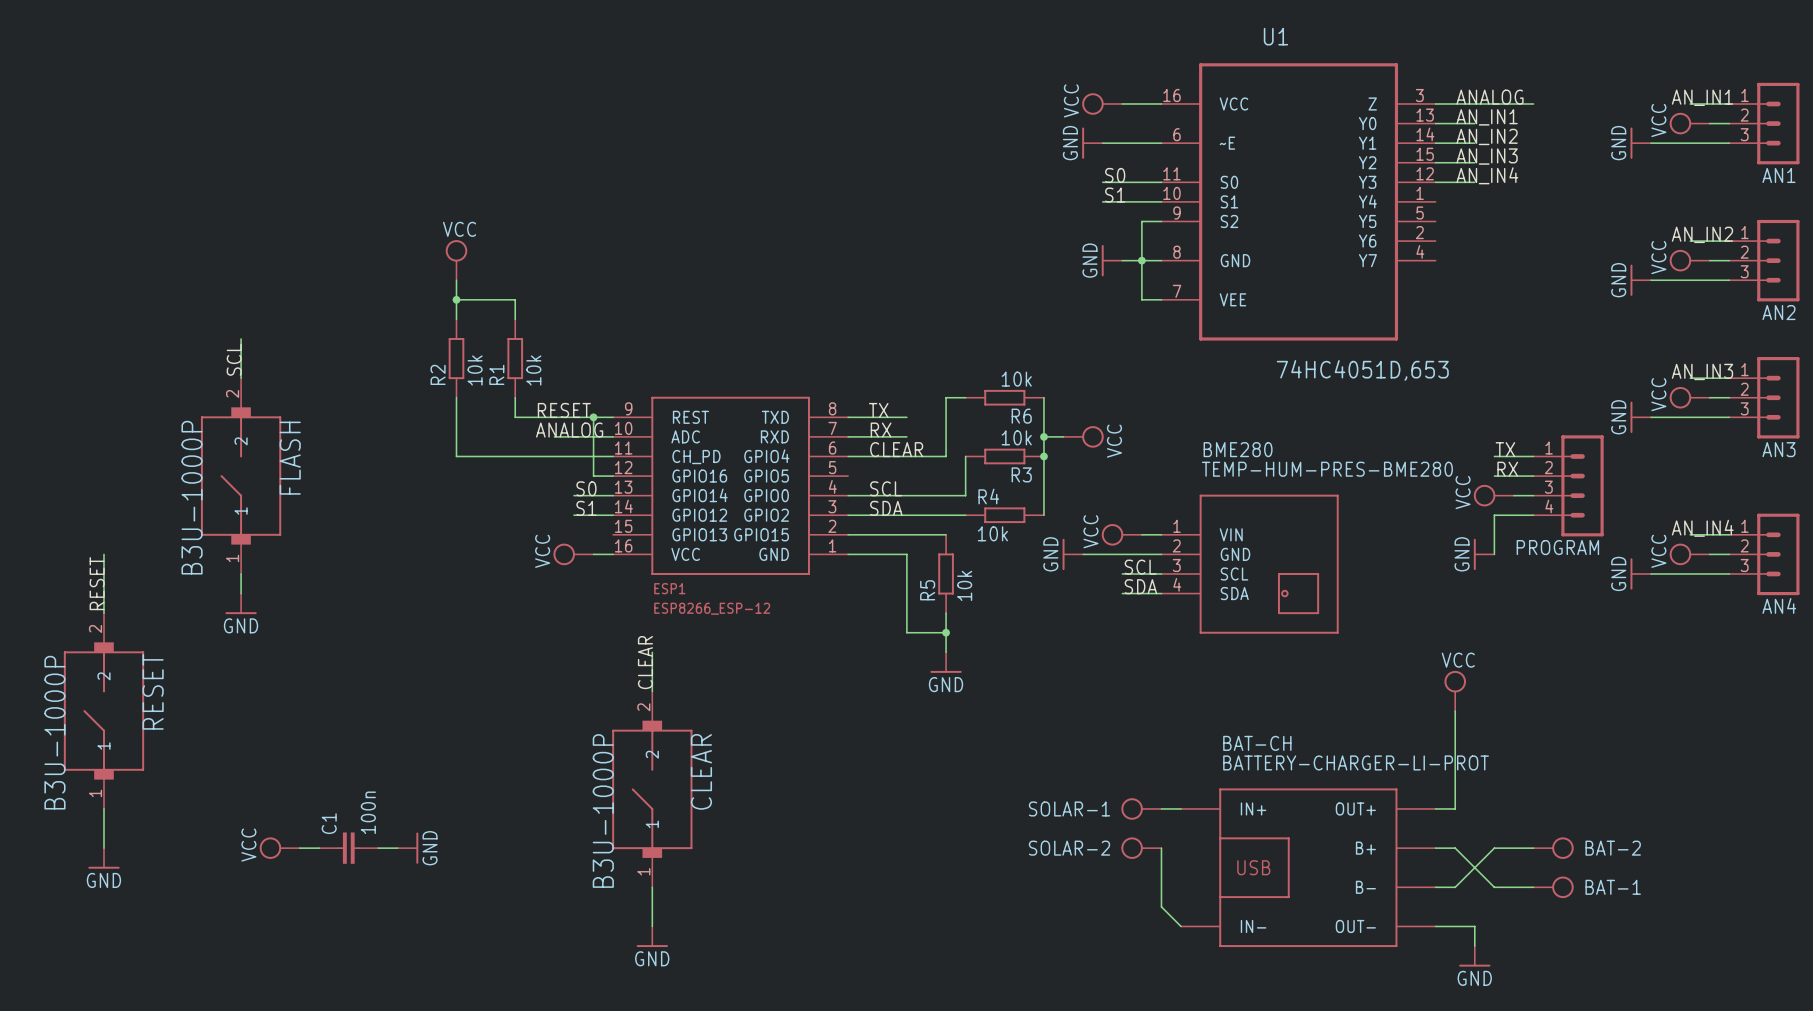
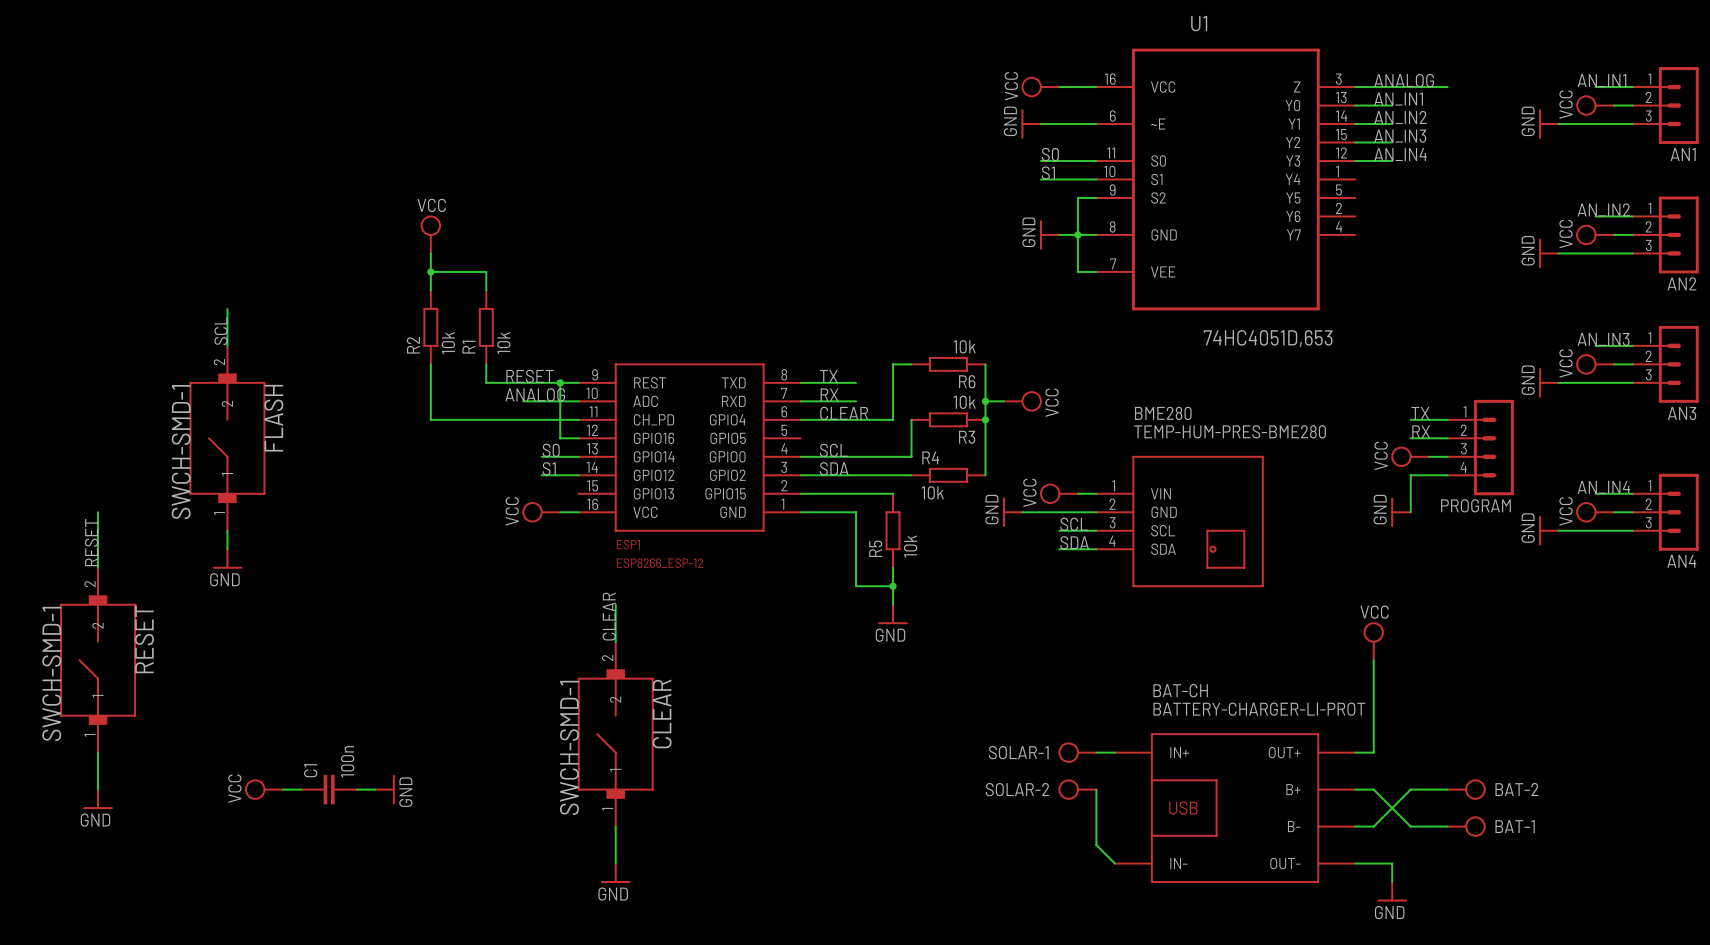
FLASH value: B3U-1000P (192, 497) -> SWCH-SMD-1 (181, 452)
RESET value: B3U-1000P (54, 732) -> SWCH-SMD-1 (51, 673)
CLEAR value: B3U-1000P (603, 811) -> SWCH-SMD-1 (569, 747)

